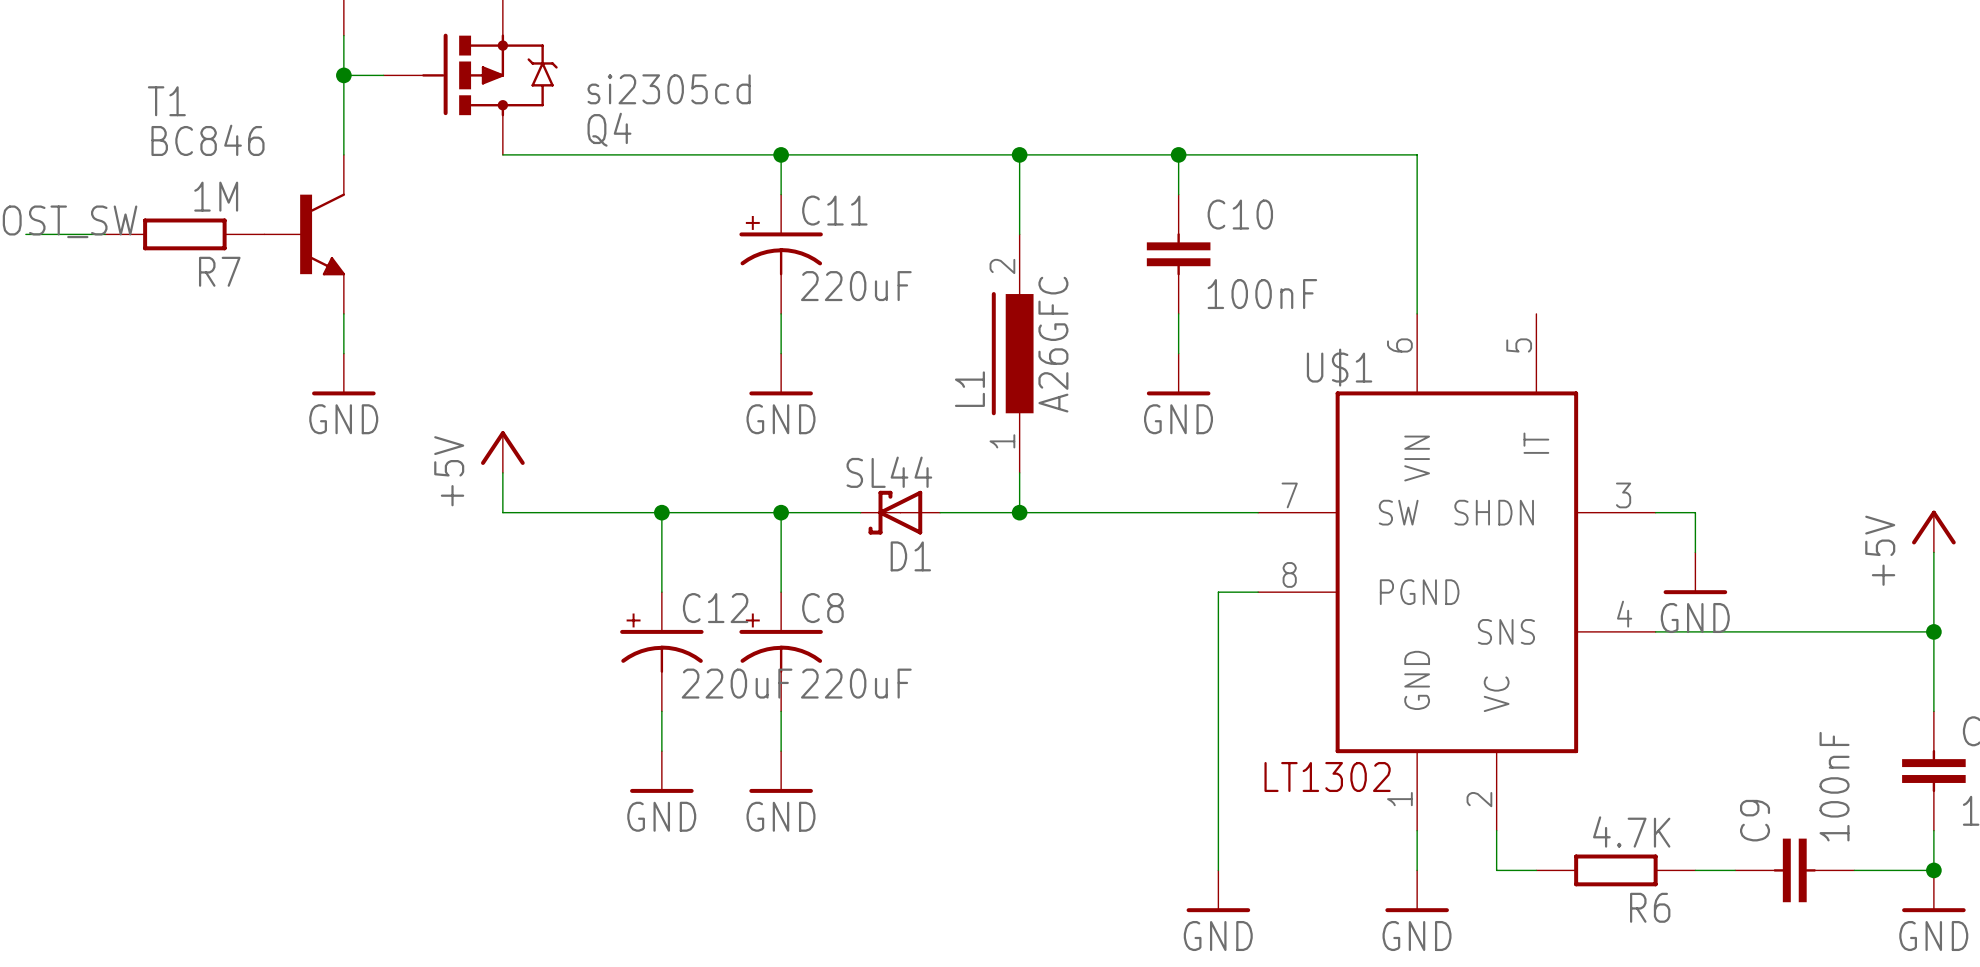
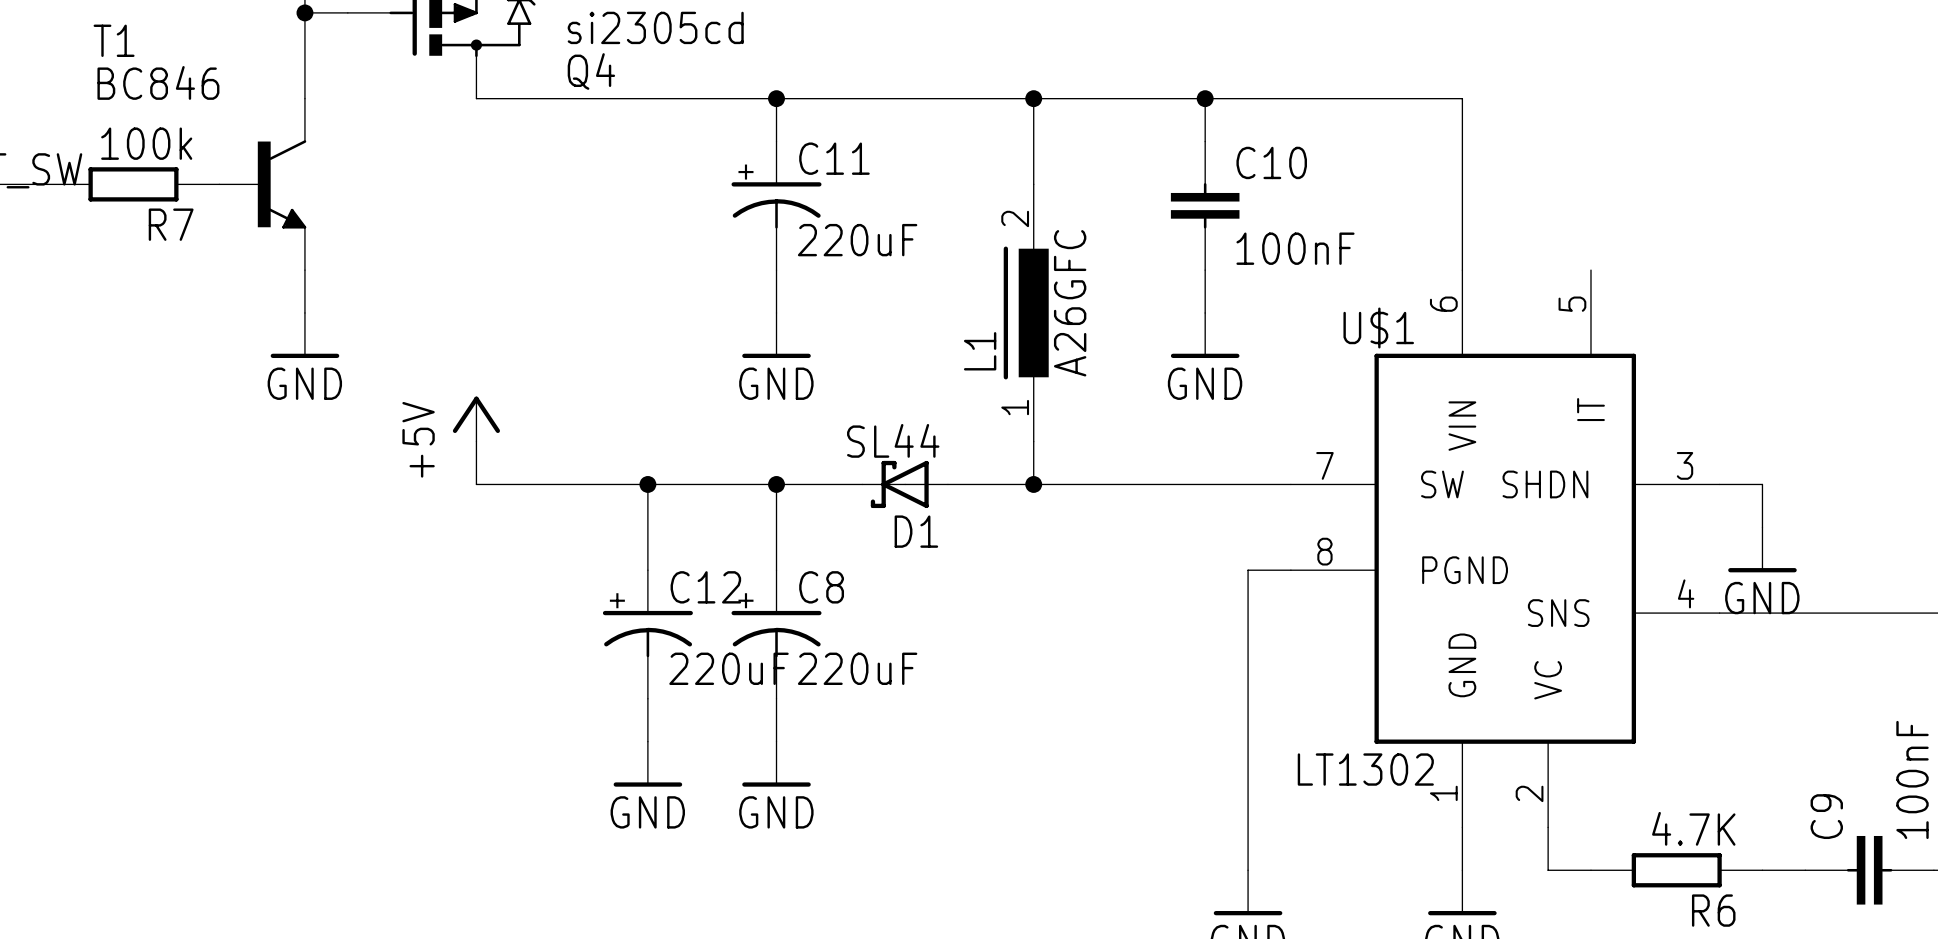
R7 value: 1M (216, 196) -> 100k (146, 143)

